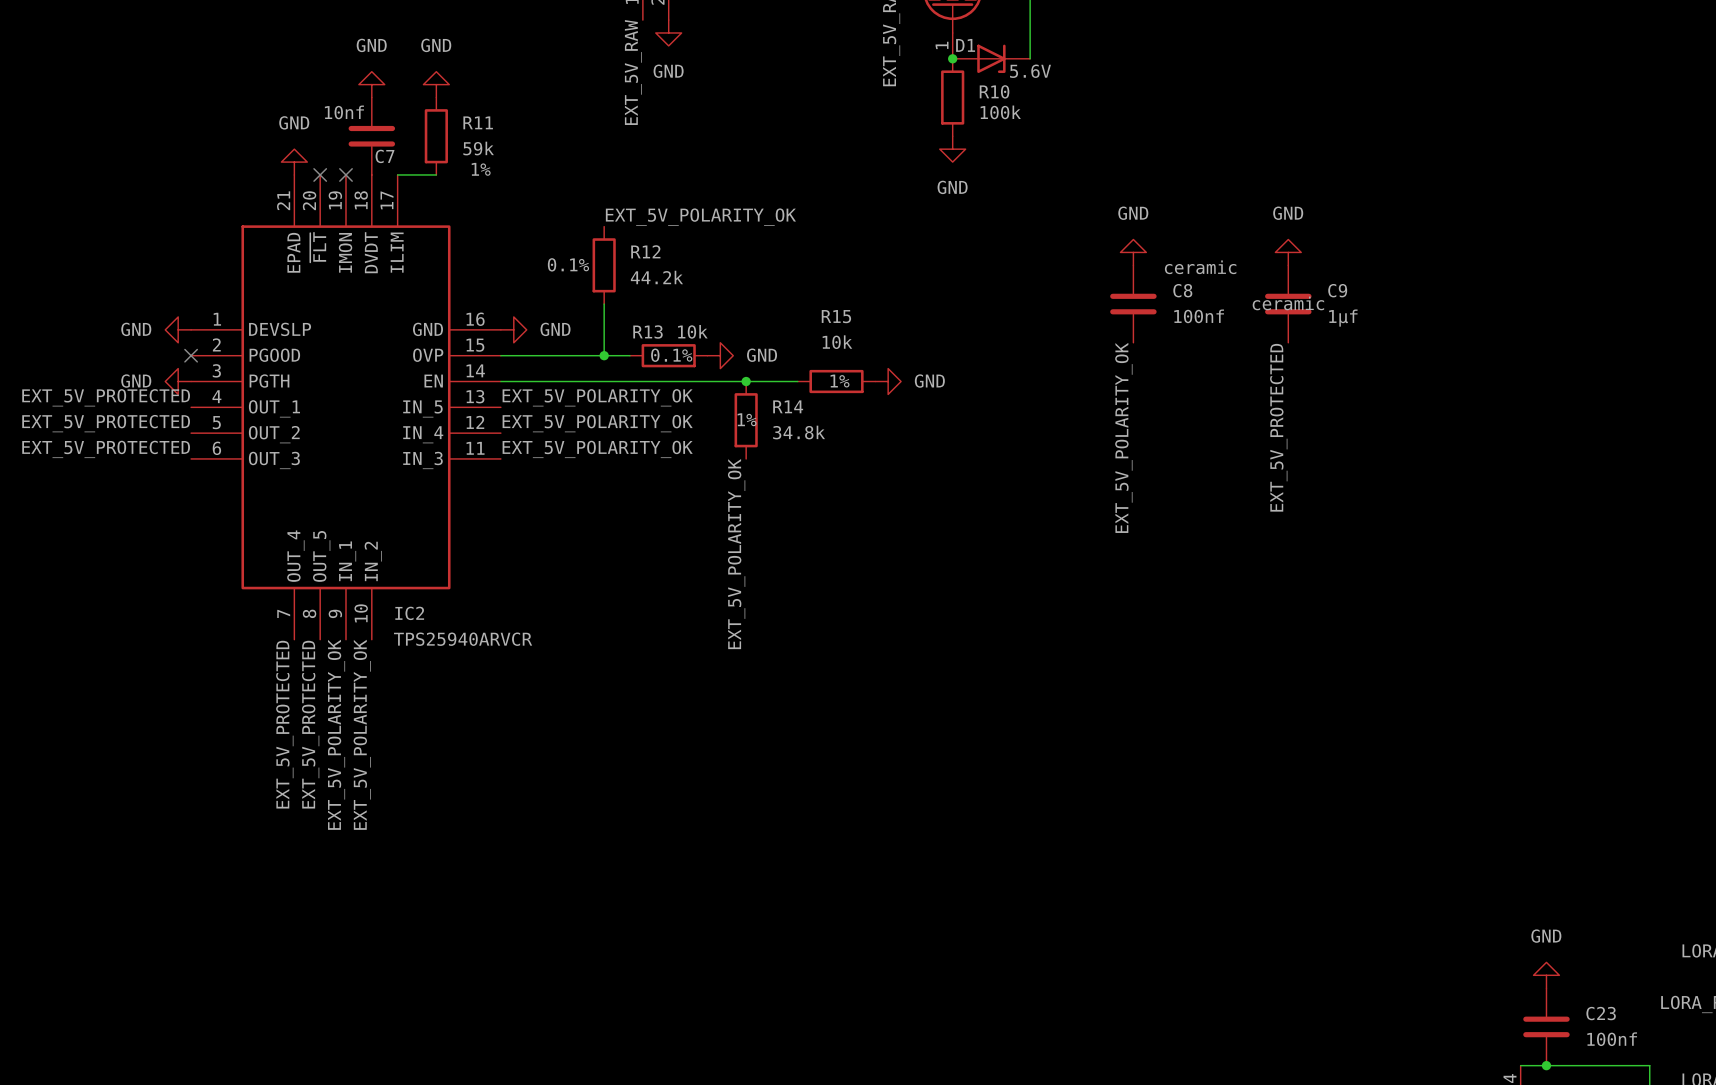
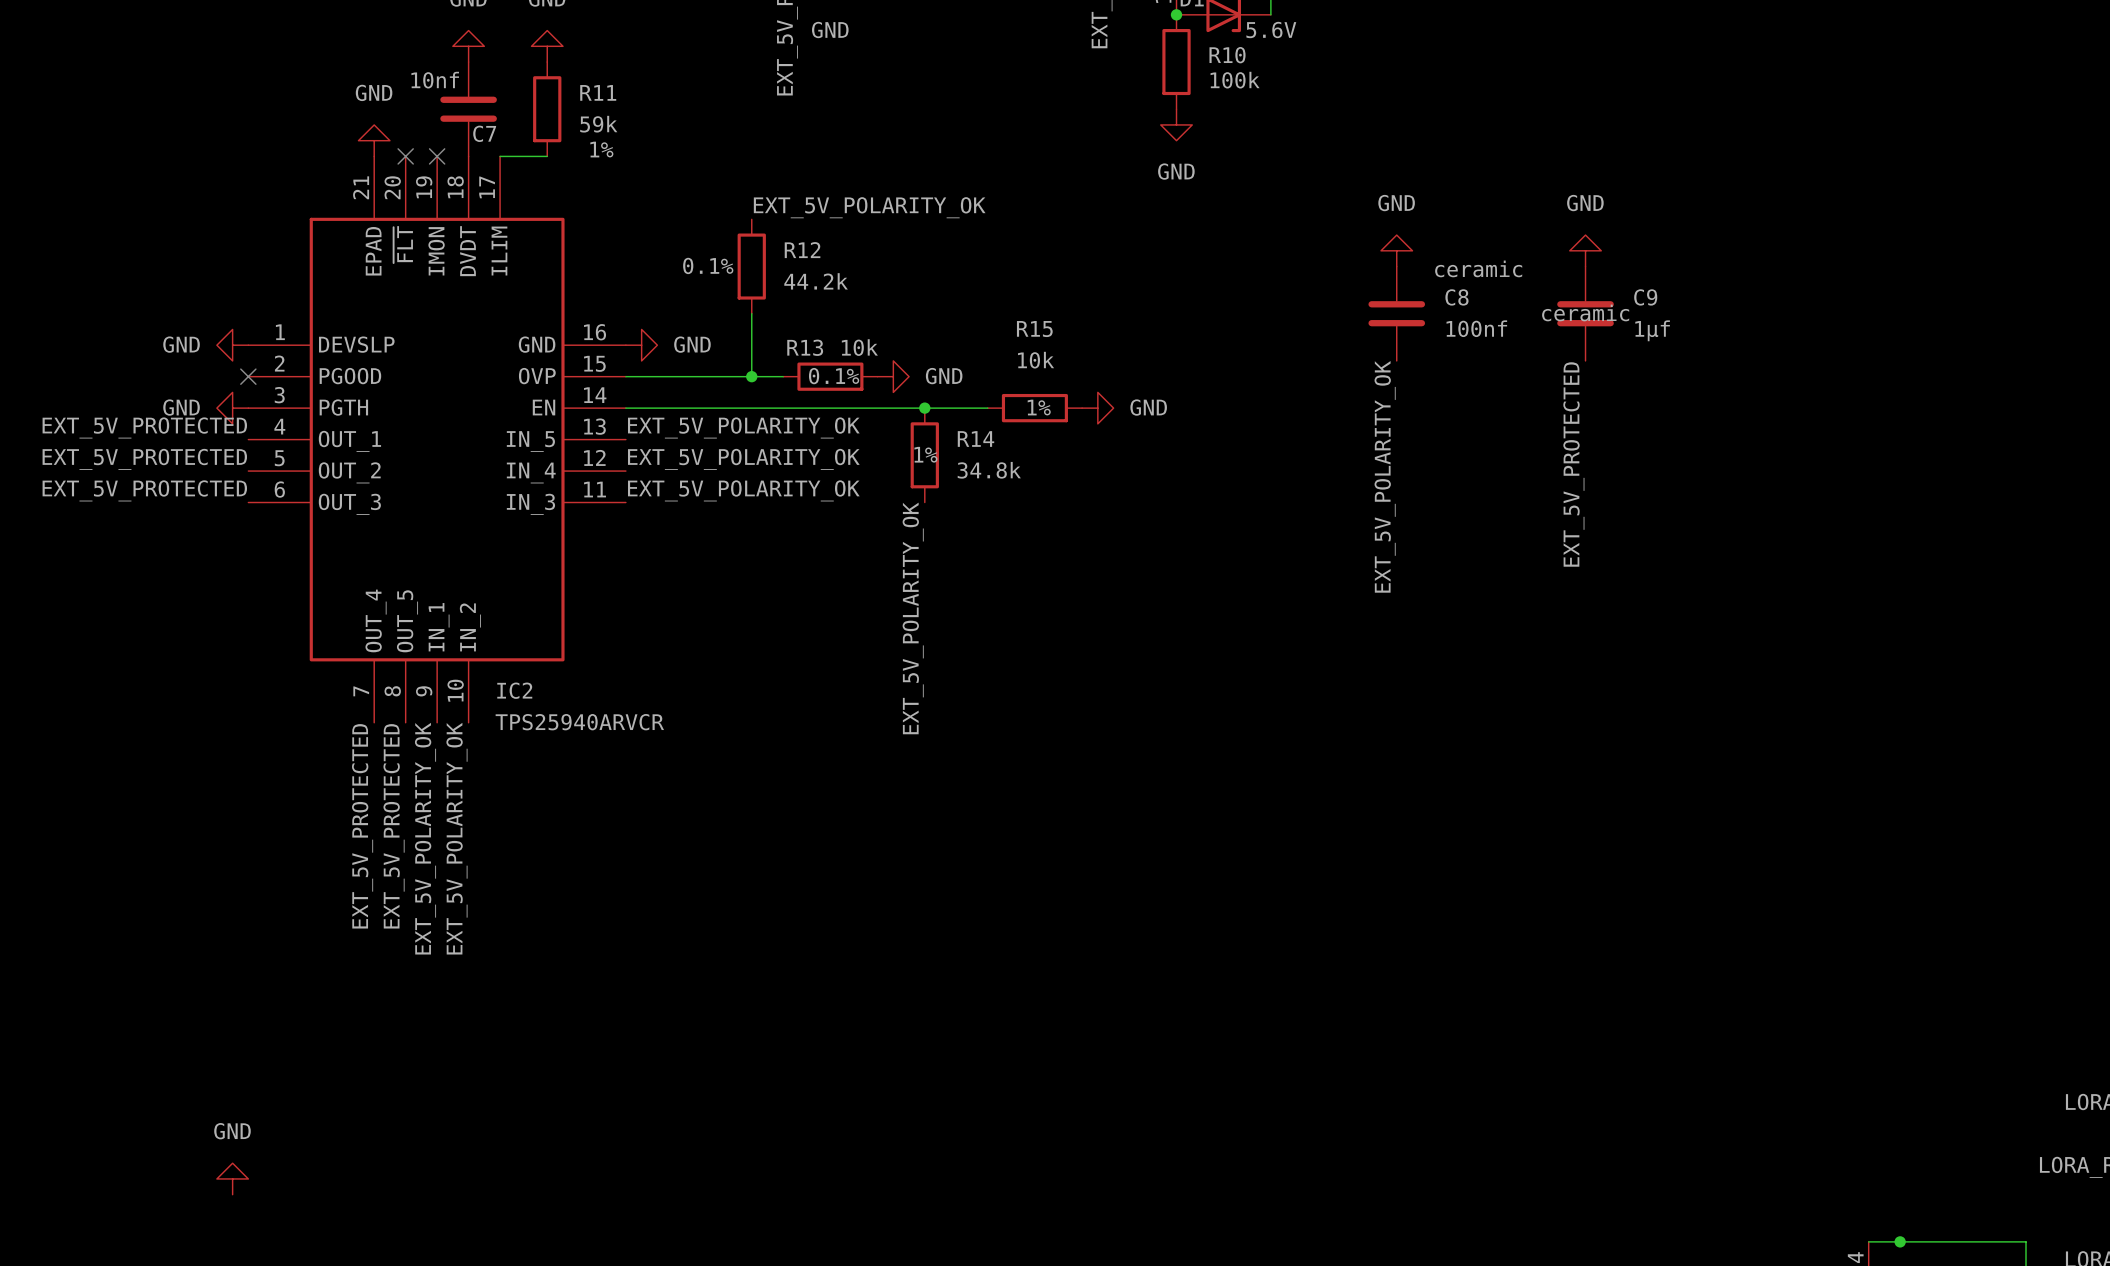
power symbol: GND (1546, 975) -> none
power symbol: none -> GND (232, 1178)
C23: 100nf (1546, 1026) -> none

